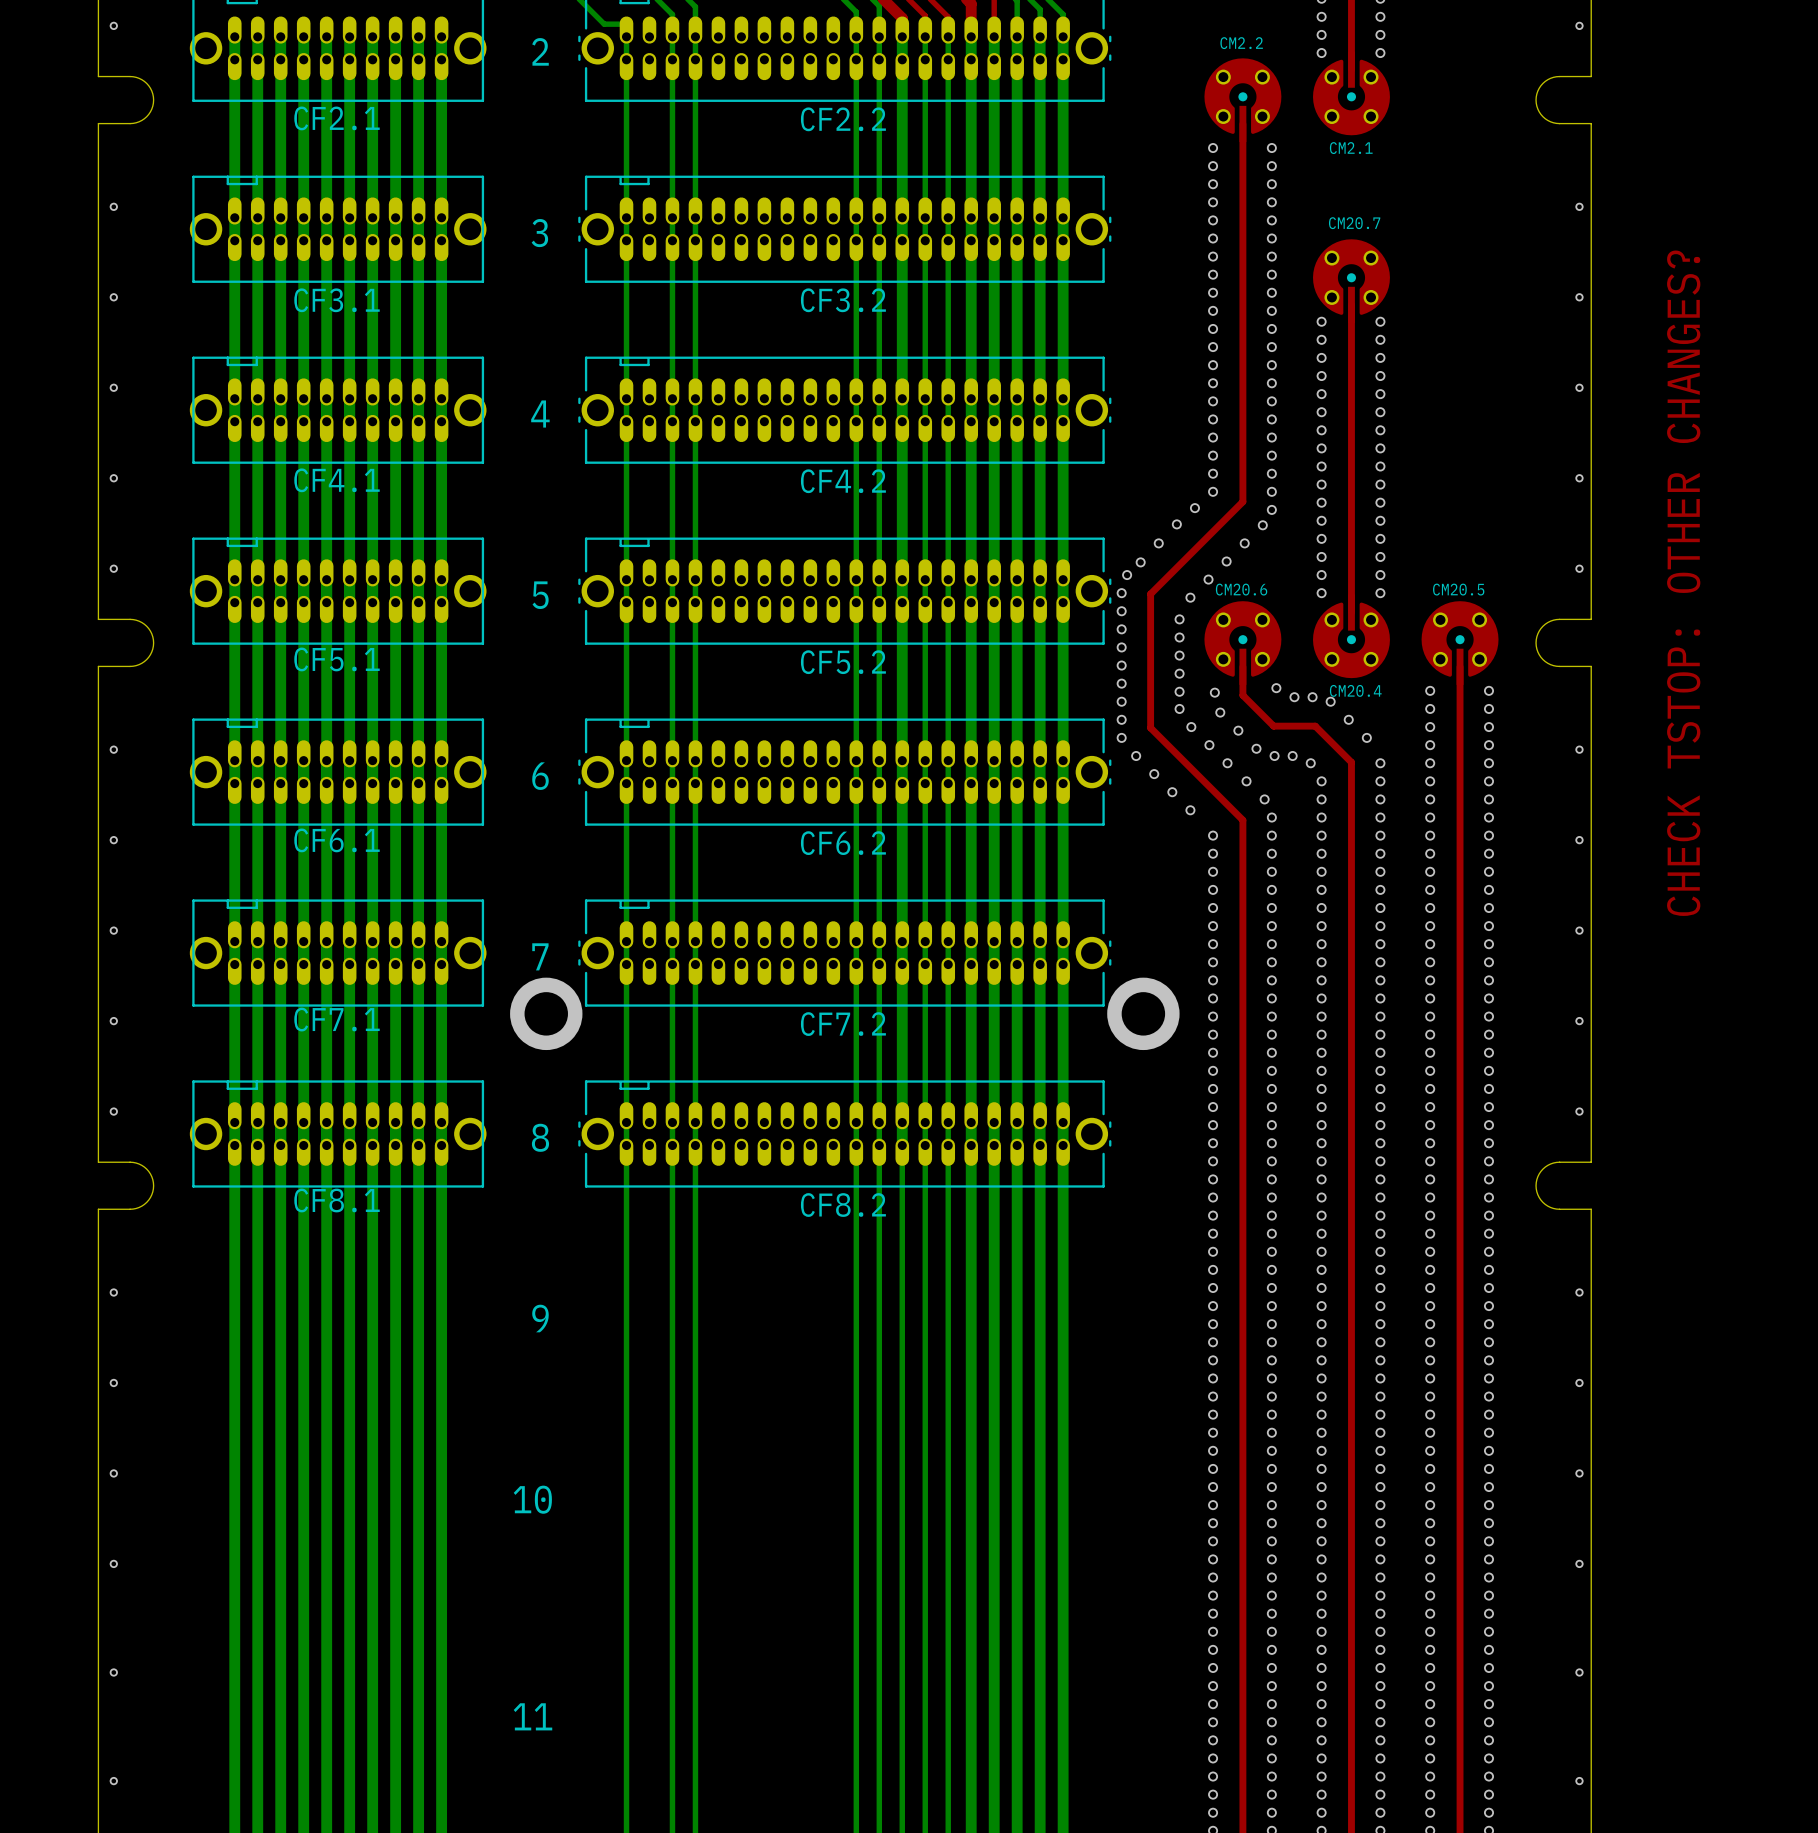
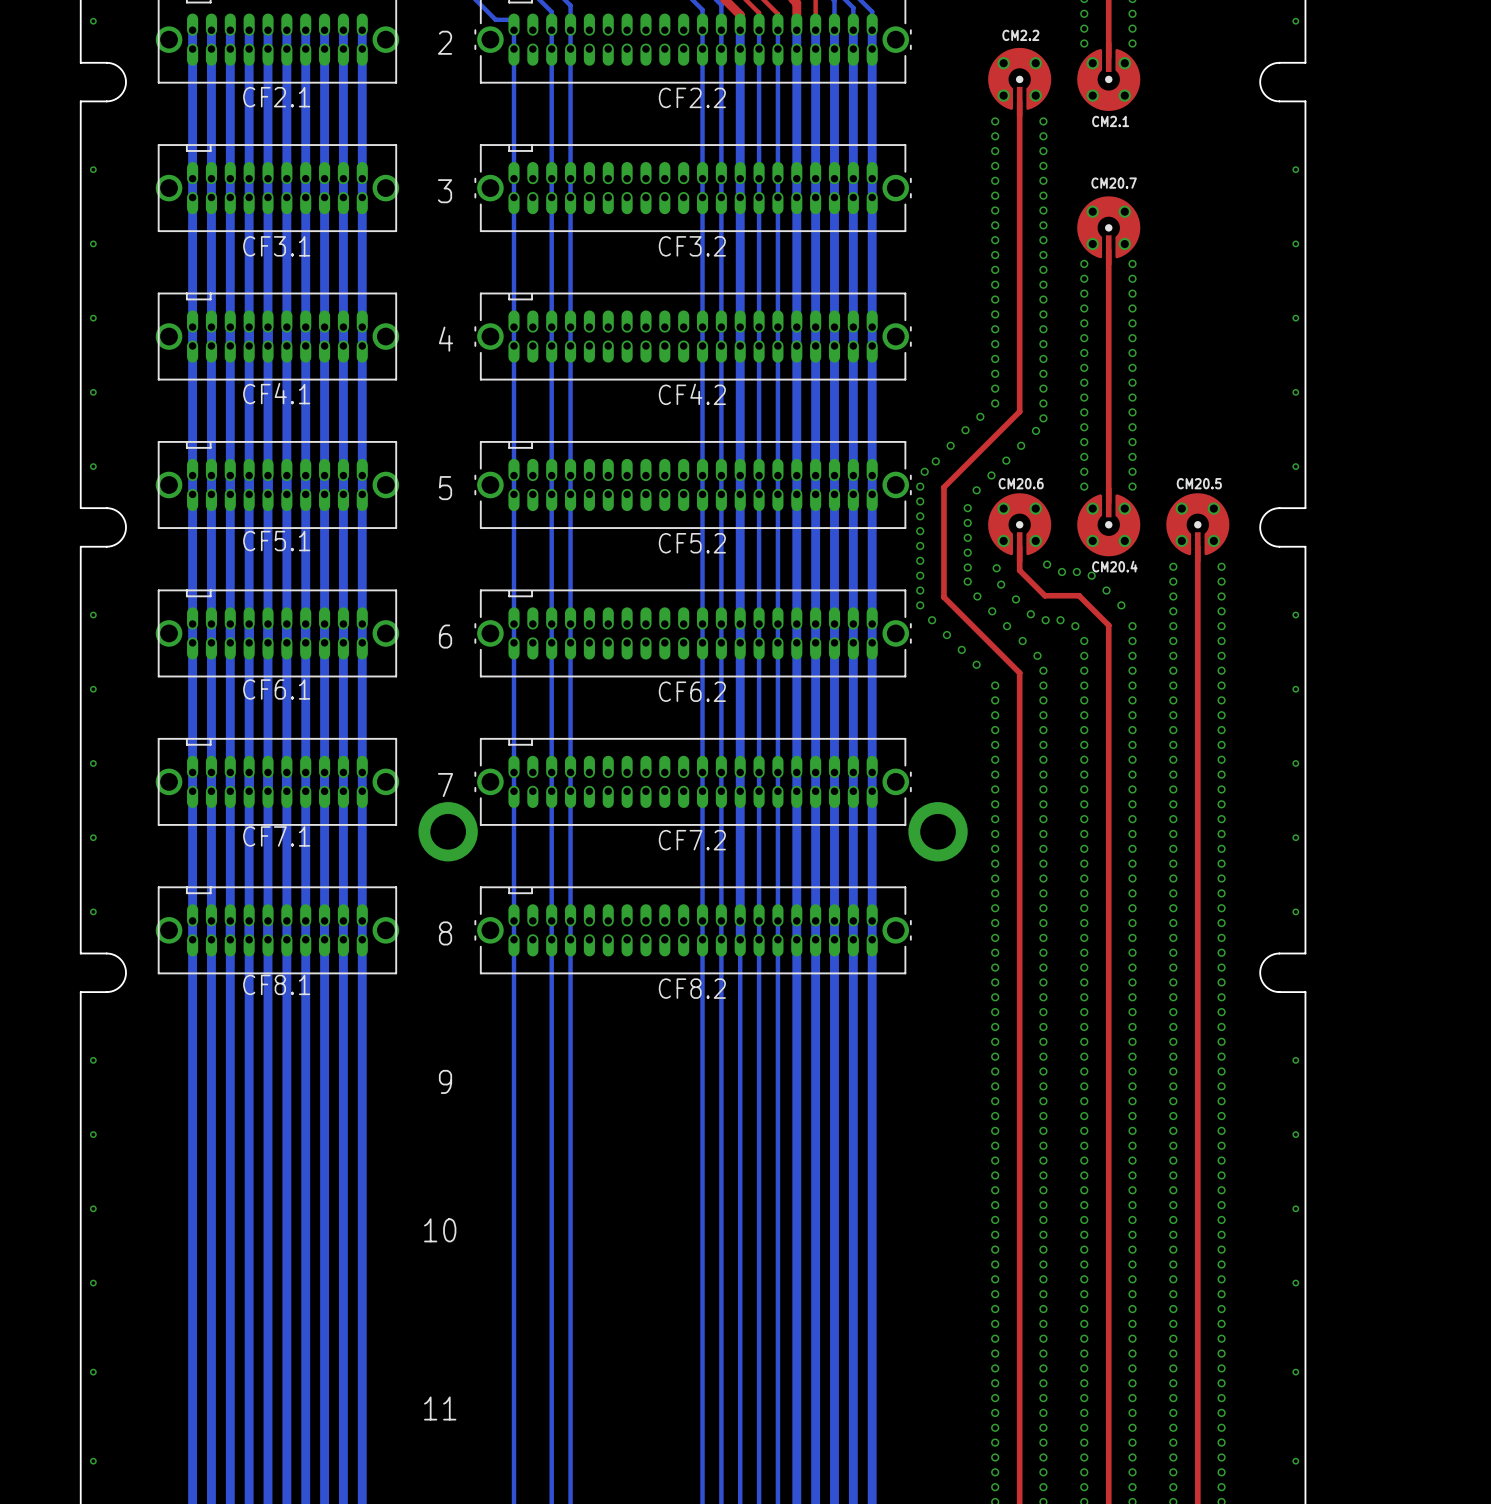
text: CHECK TSTOP: OTHER CHANGES? (1683, 583) -> none

